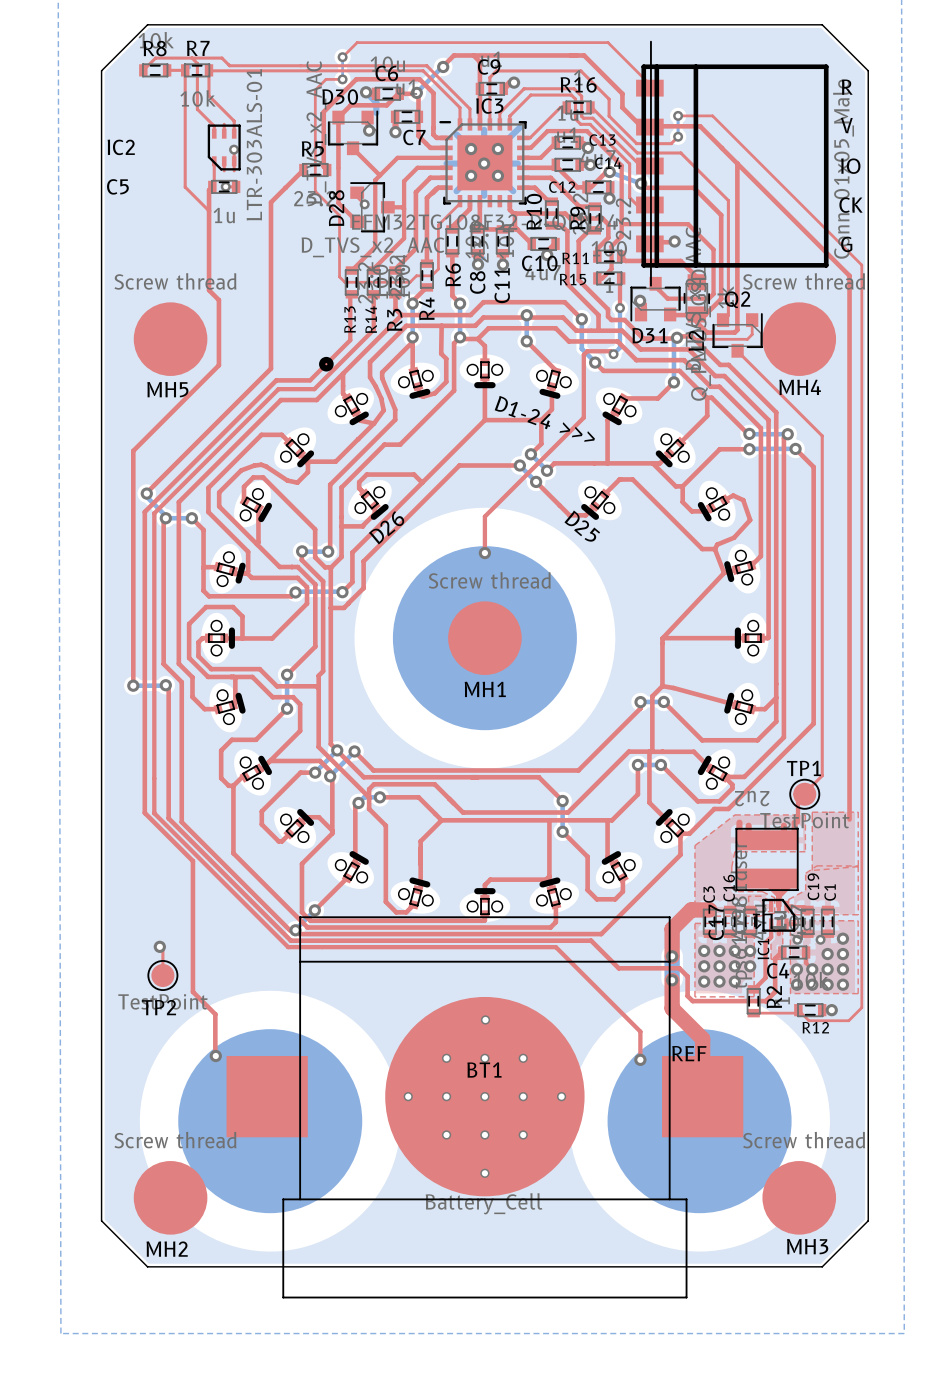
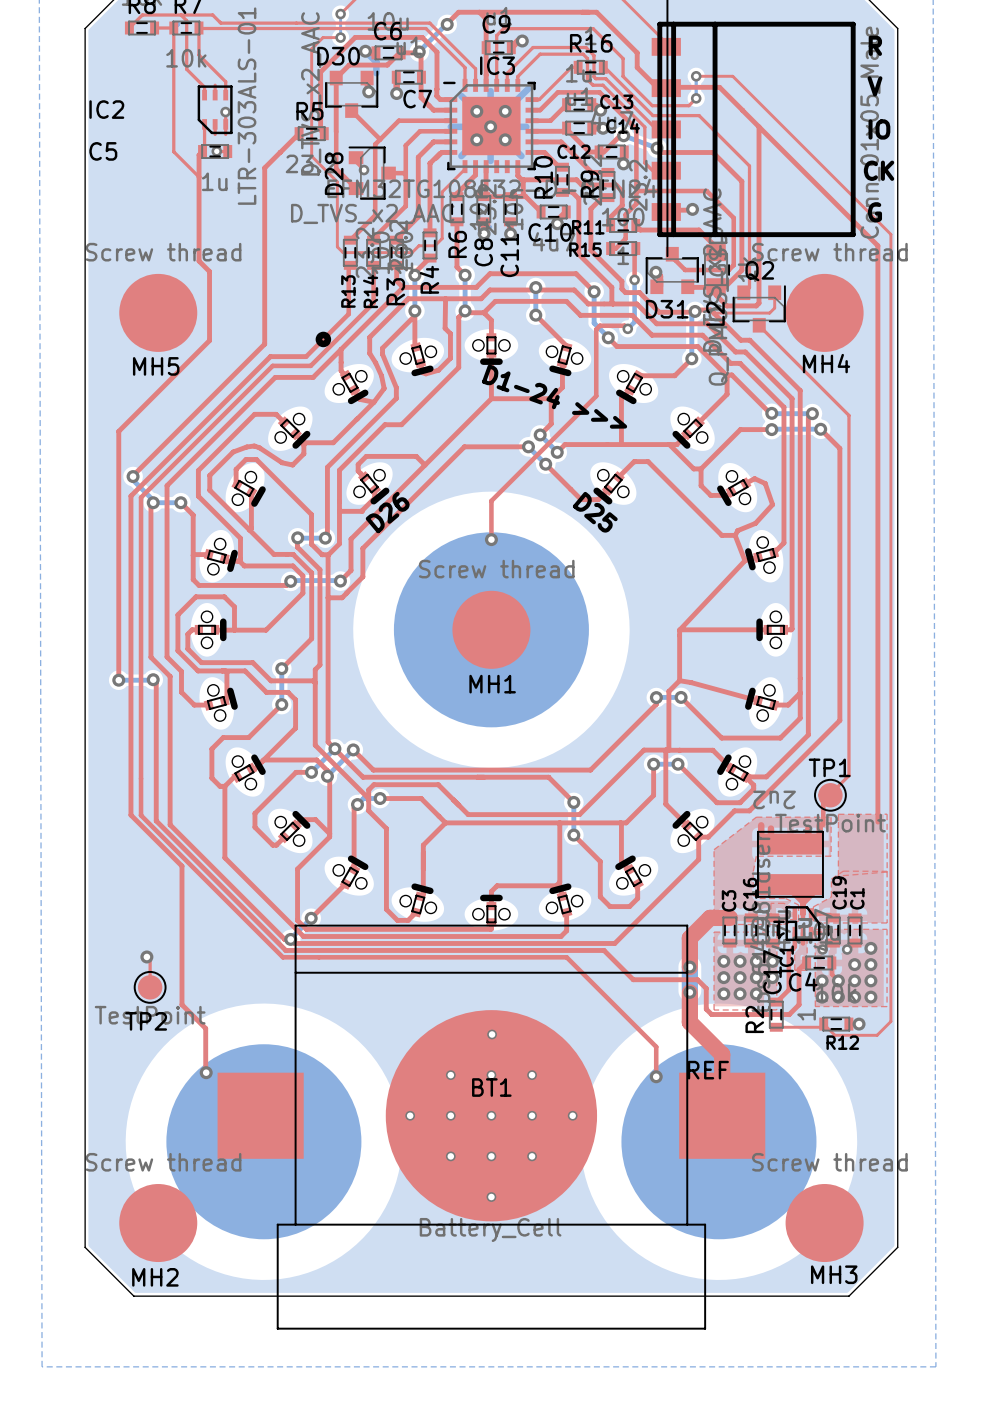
C17 name position: C17 (716, 922) -> C17 (772, 972)
R2 name position: R2 (774, 997) -> R2 (754, 1019)

